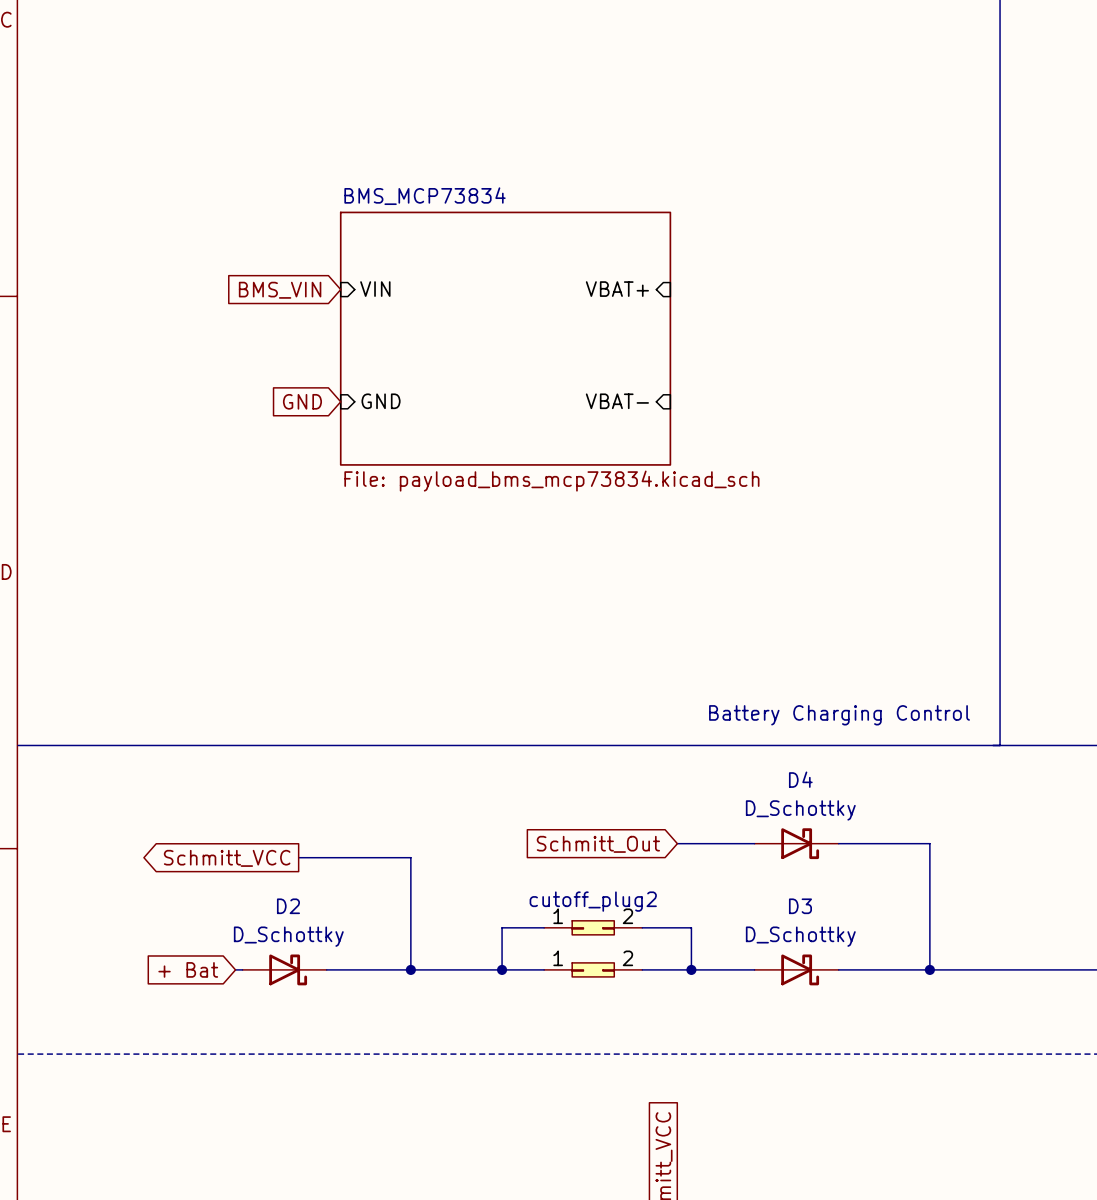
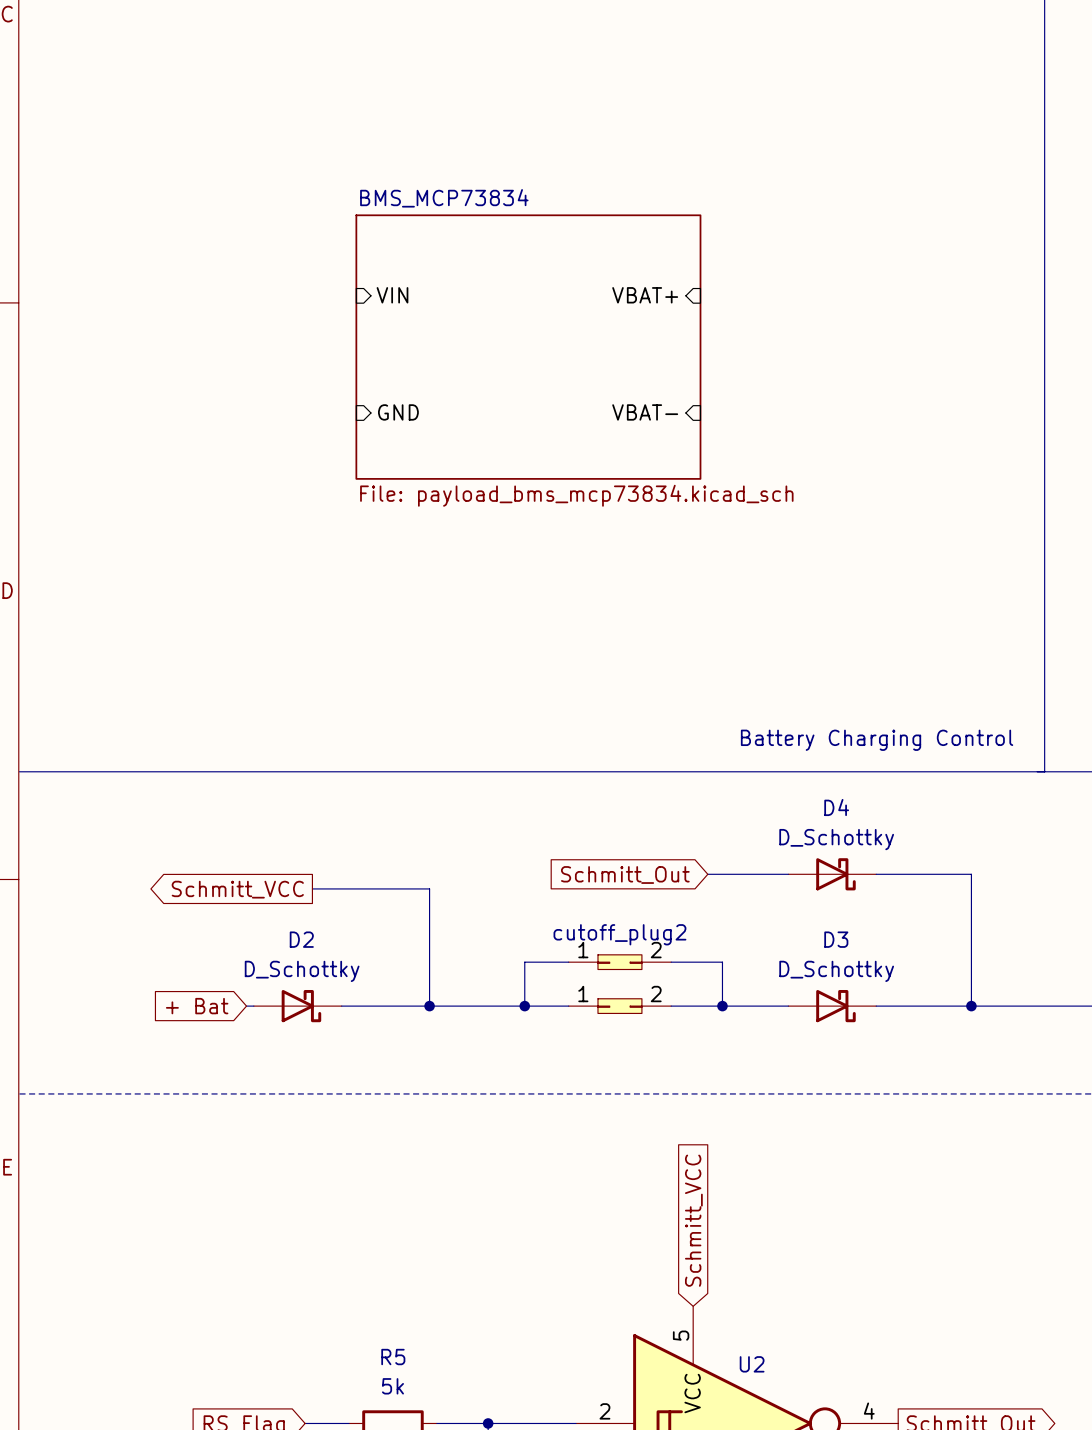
global label: BMS_VIN (280, 290) -> none
global label: GND (302, 401) -> none

